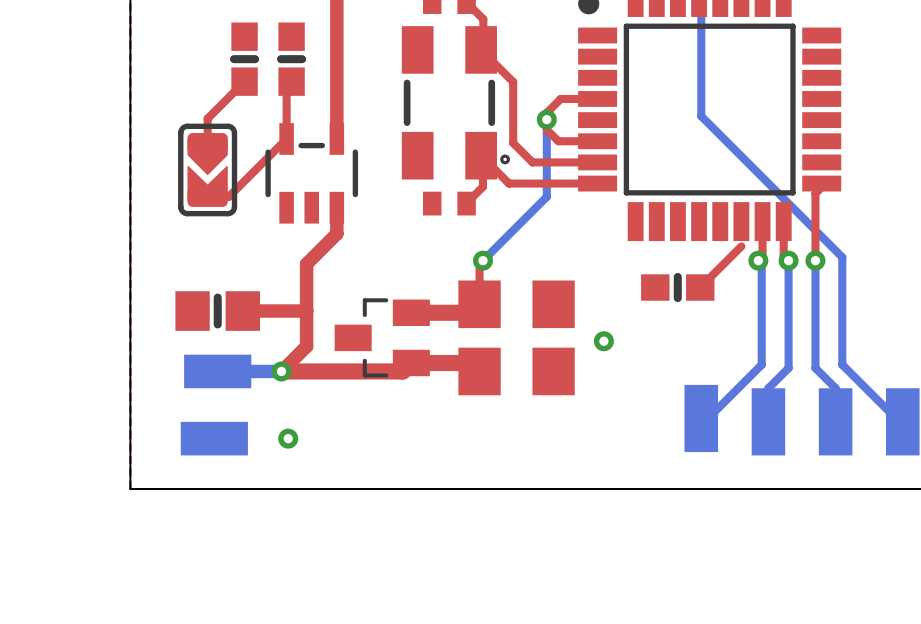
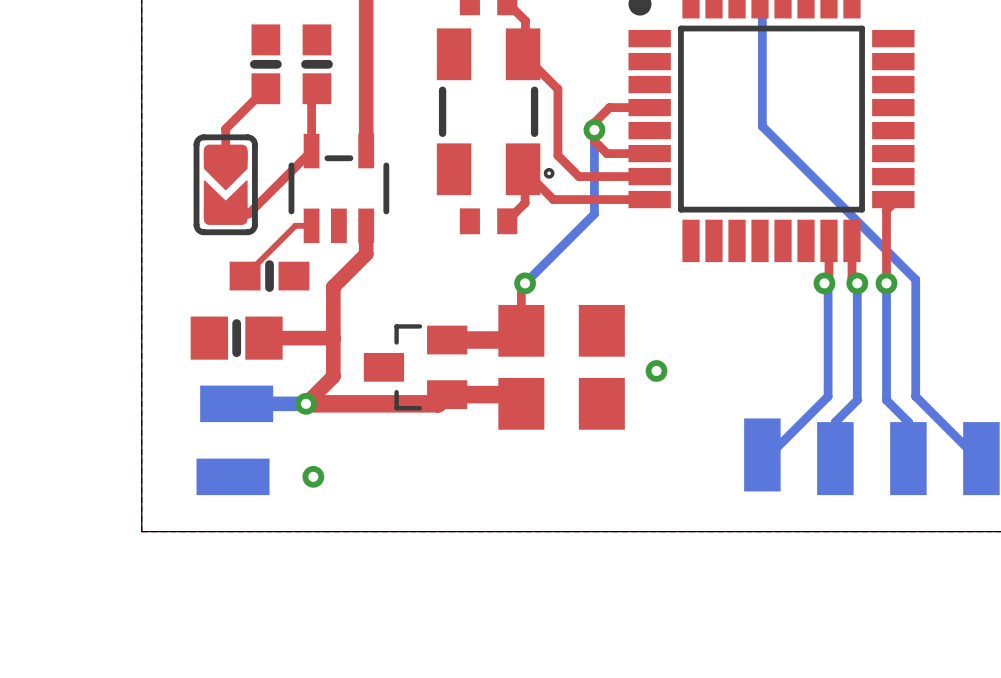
top track: none -> (311, 225) (295, 225) (245, 276)
top track: (741, 246) (700, 287) -> none
part position: (677, 287) -> (269, 276)

